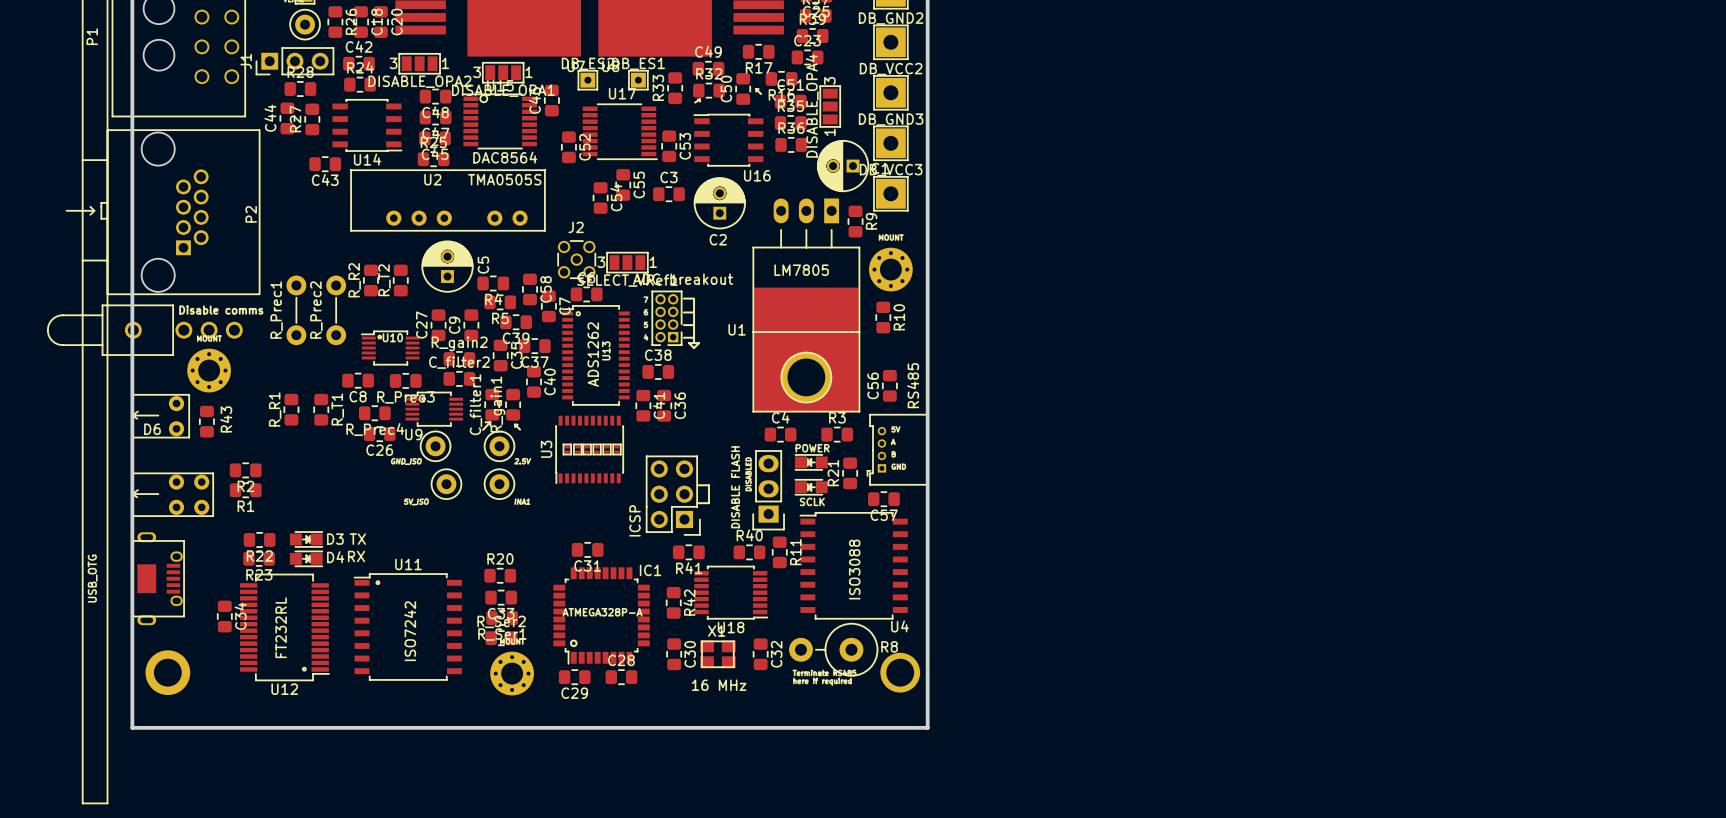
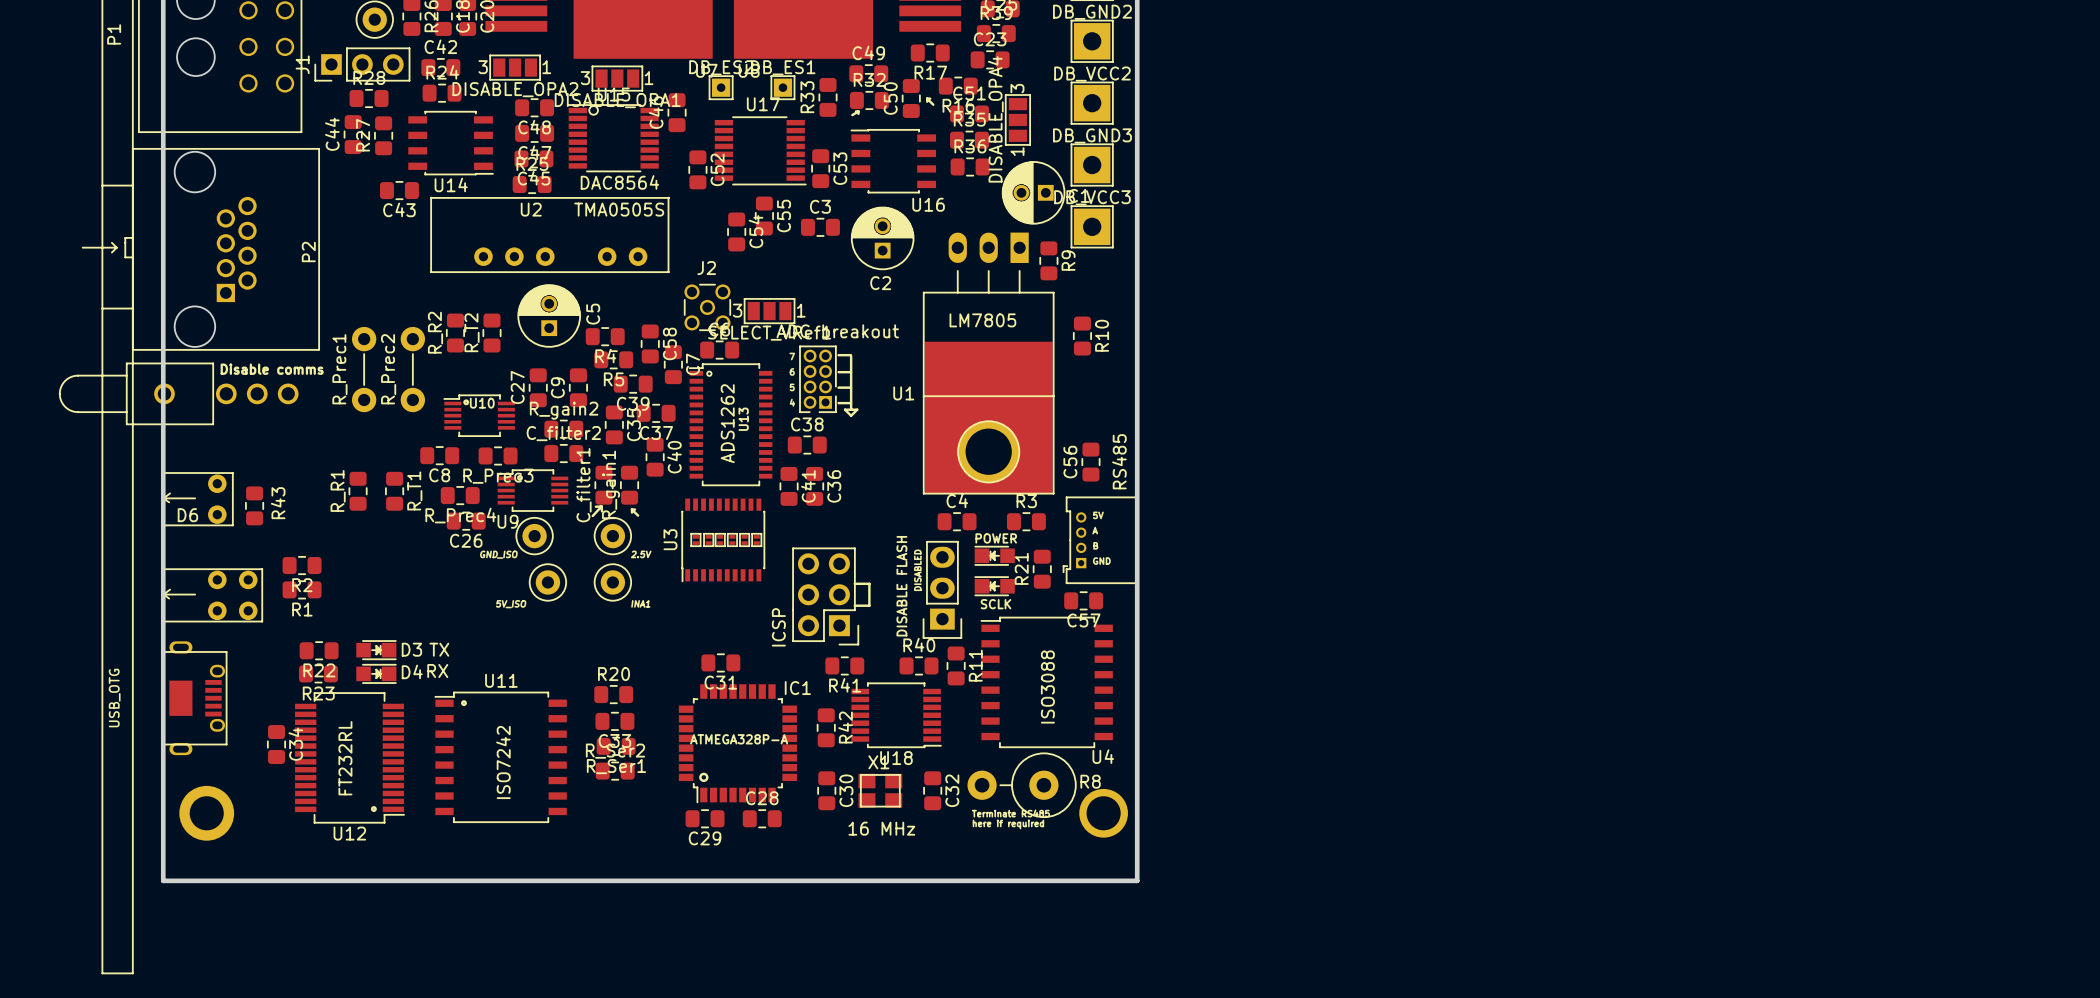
part: (890, 269) -> none
R10 position: (883, 317) -> (1082, 336)
part: (209, 370) -> none
part: (512, 673) -> none

